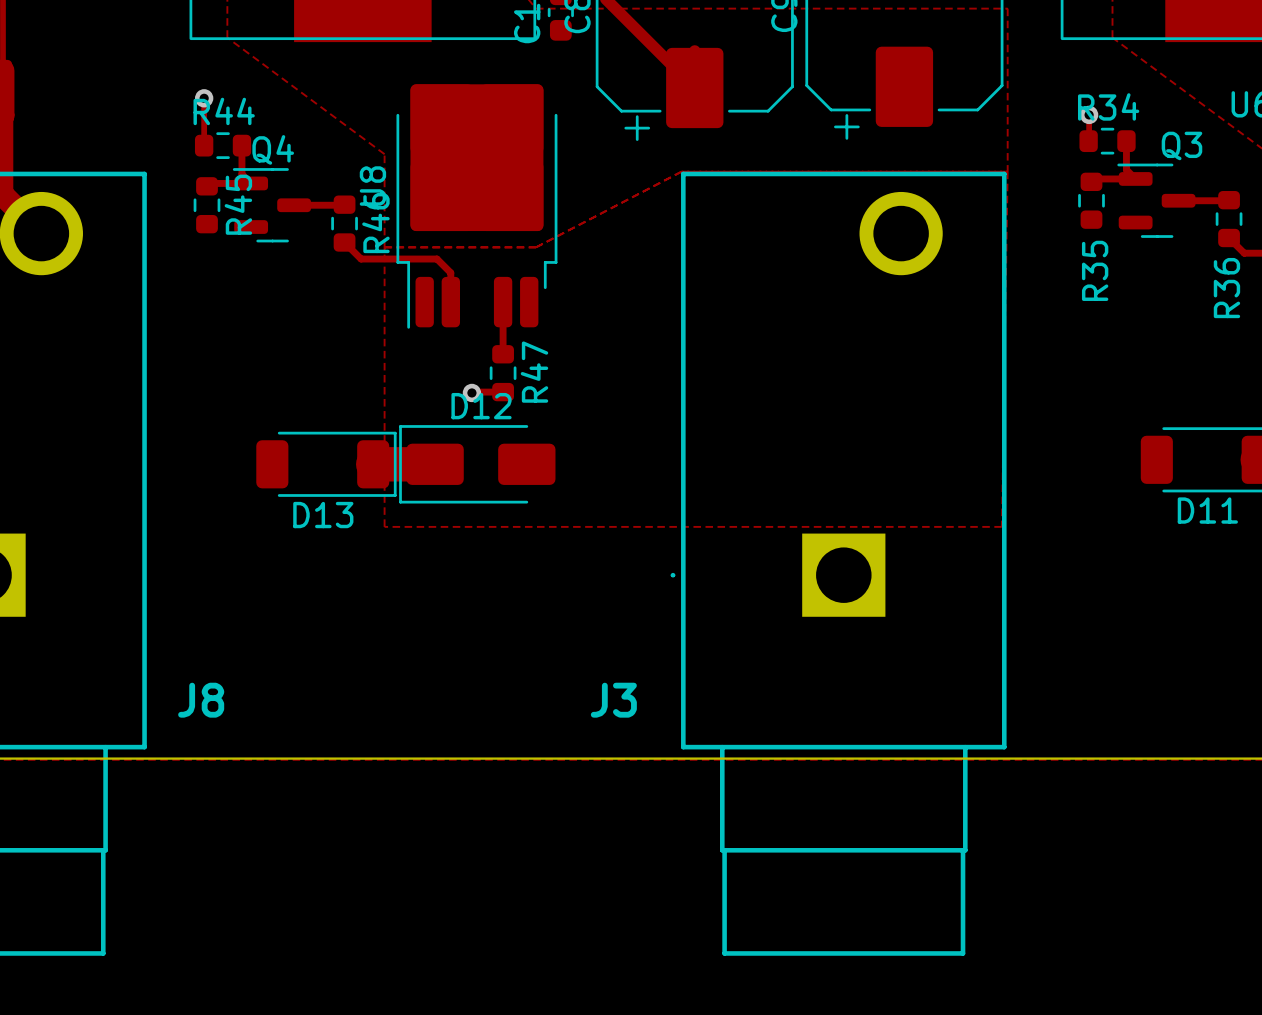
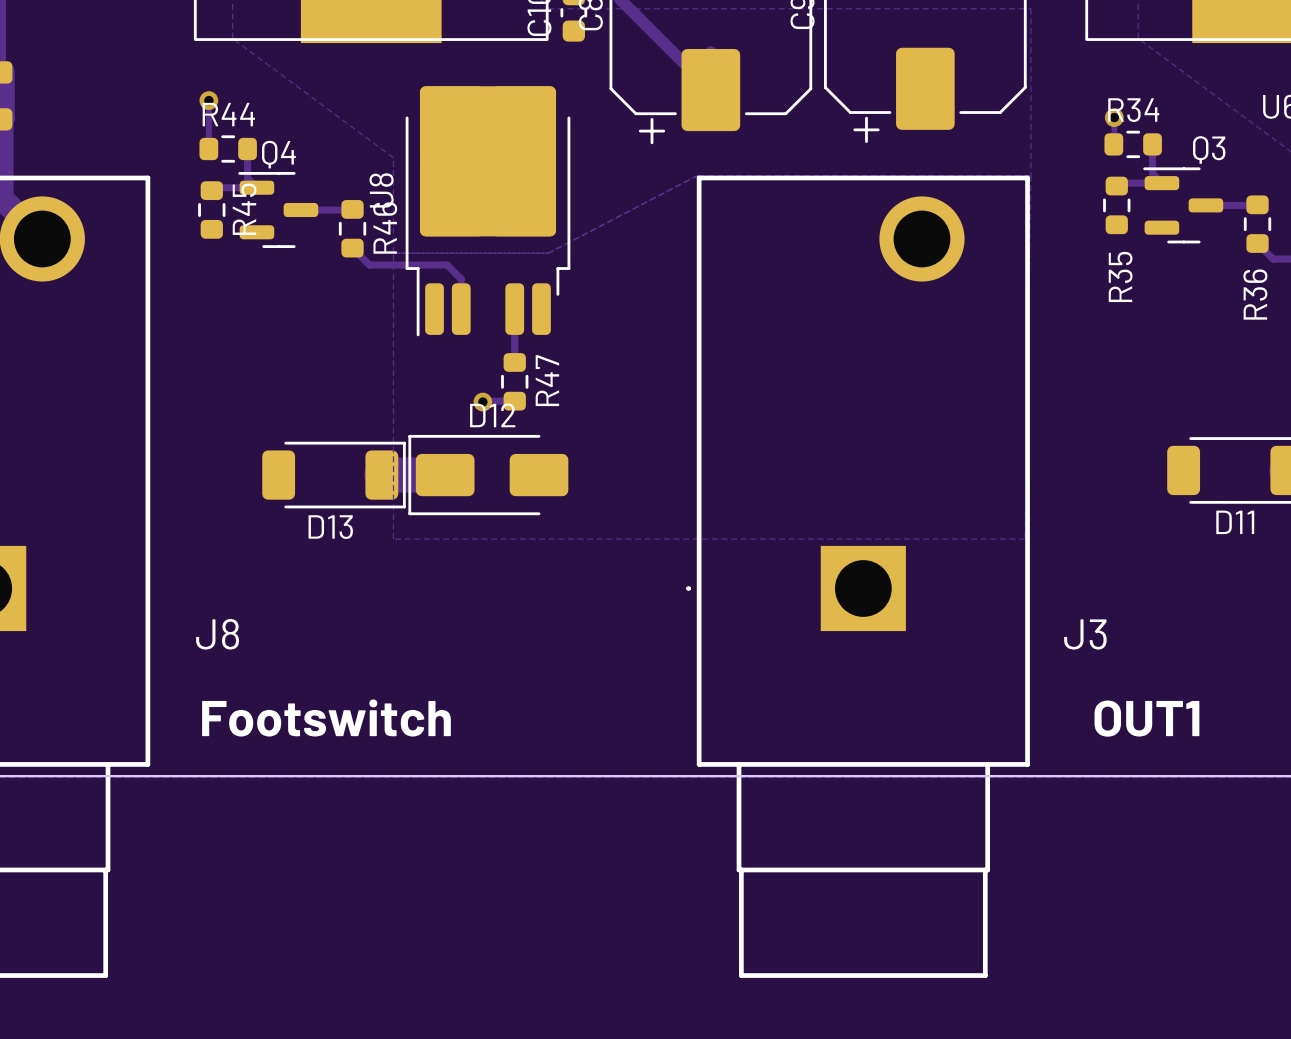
J8 name position: J8 (201, 700) -> J8 (217, 634)
J3 name position: J3 (613, 700) -> J3 (1085, 634)
text: none -> Footswitch (326, 717)
text: none -> OUT1 (1146, 718)

